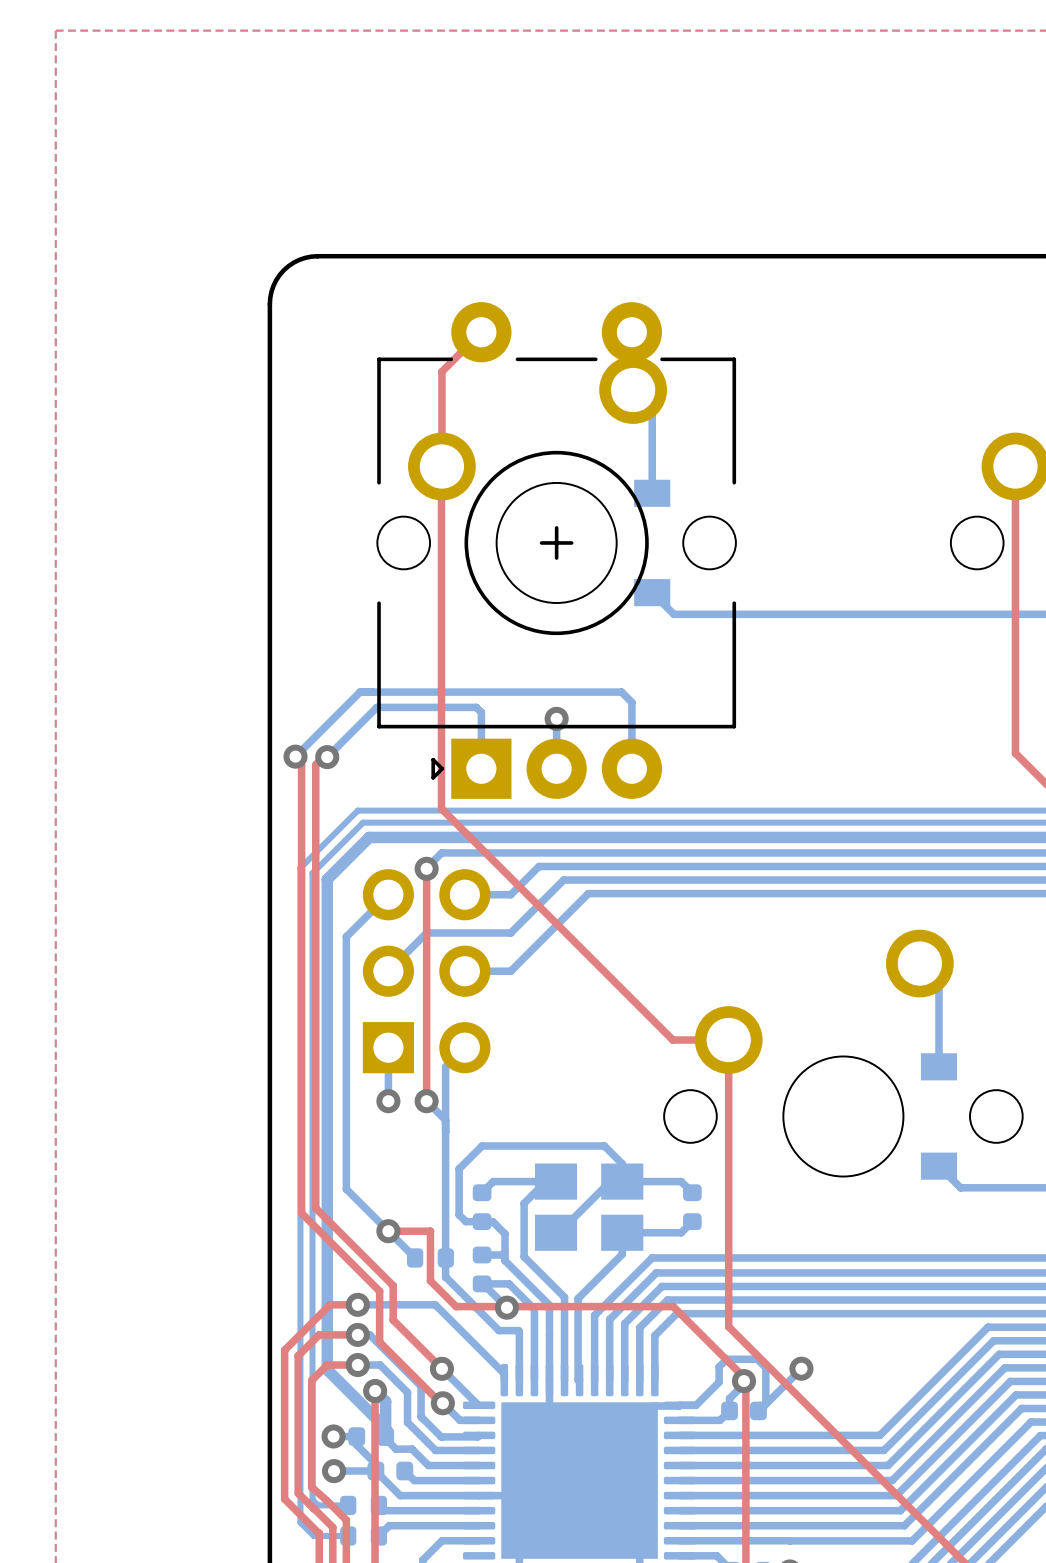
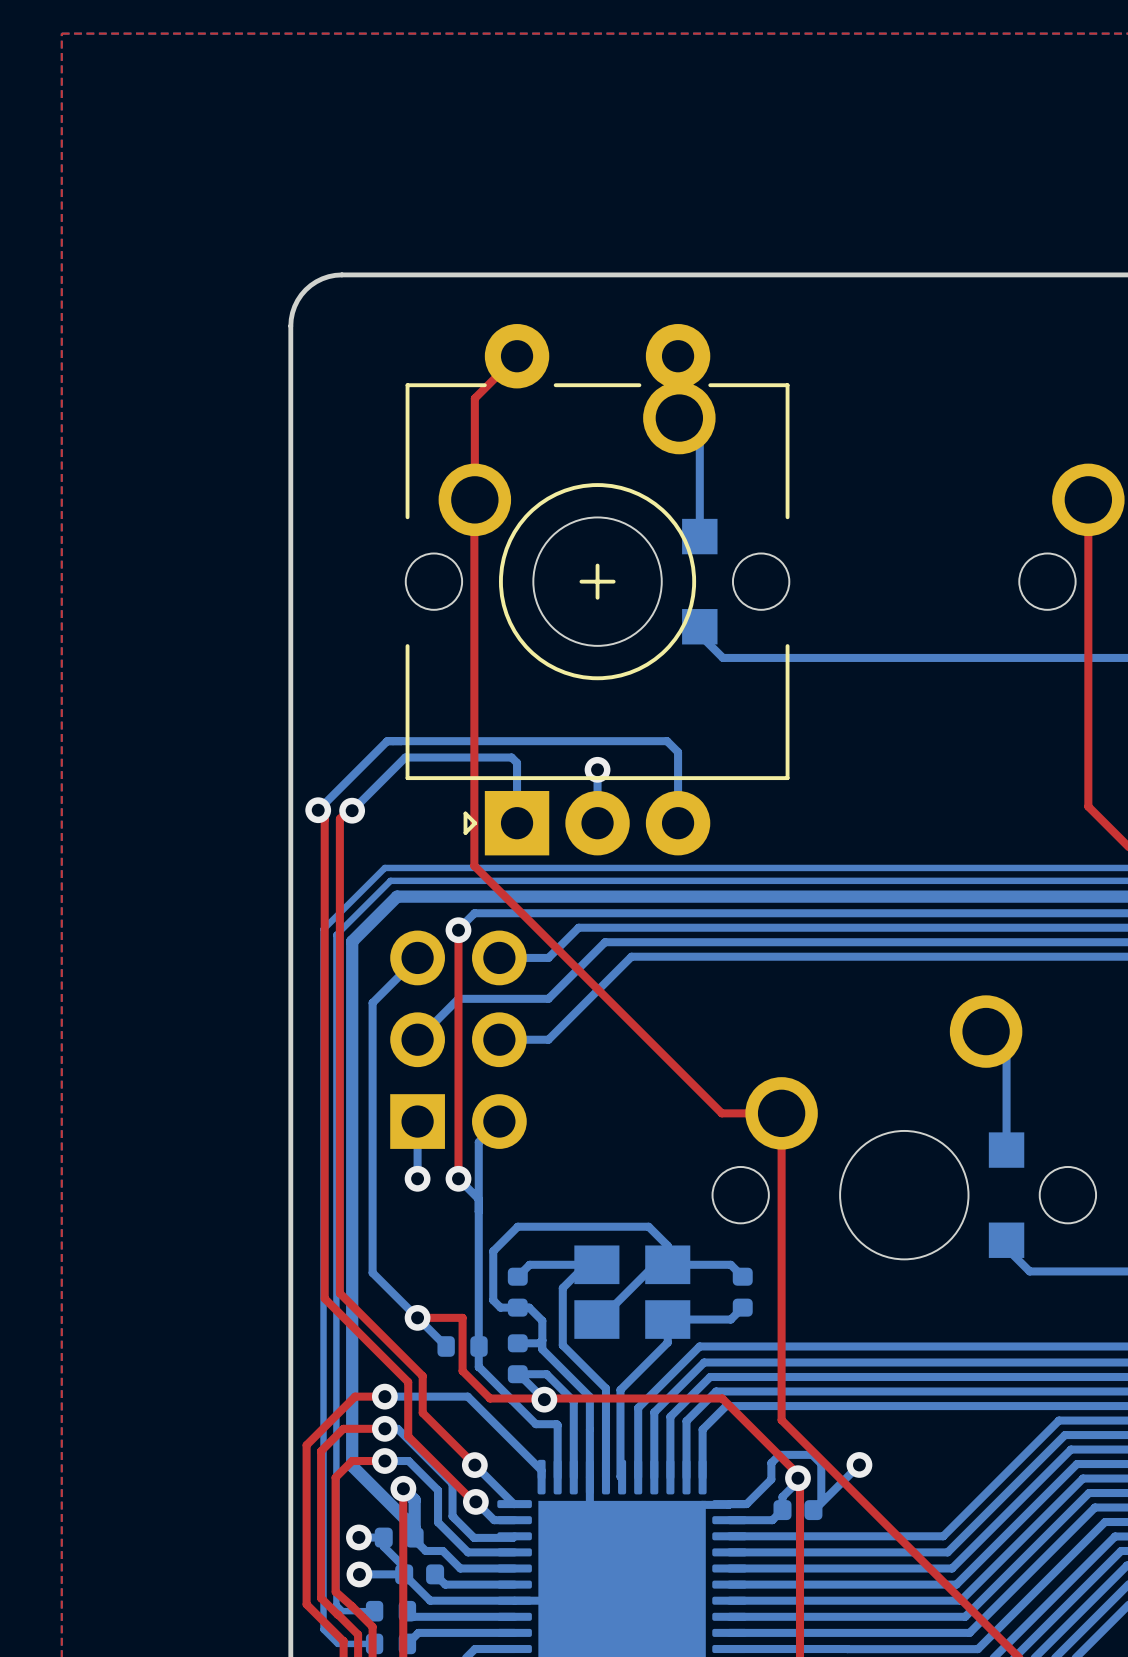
part footprint: [634, 479, 671, 607] -> [682, 518, 718, 645]
part footprint: [920, 1053, 958, 1180] -> [988, 1132, 1025, 1258]

